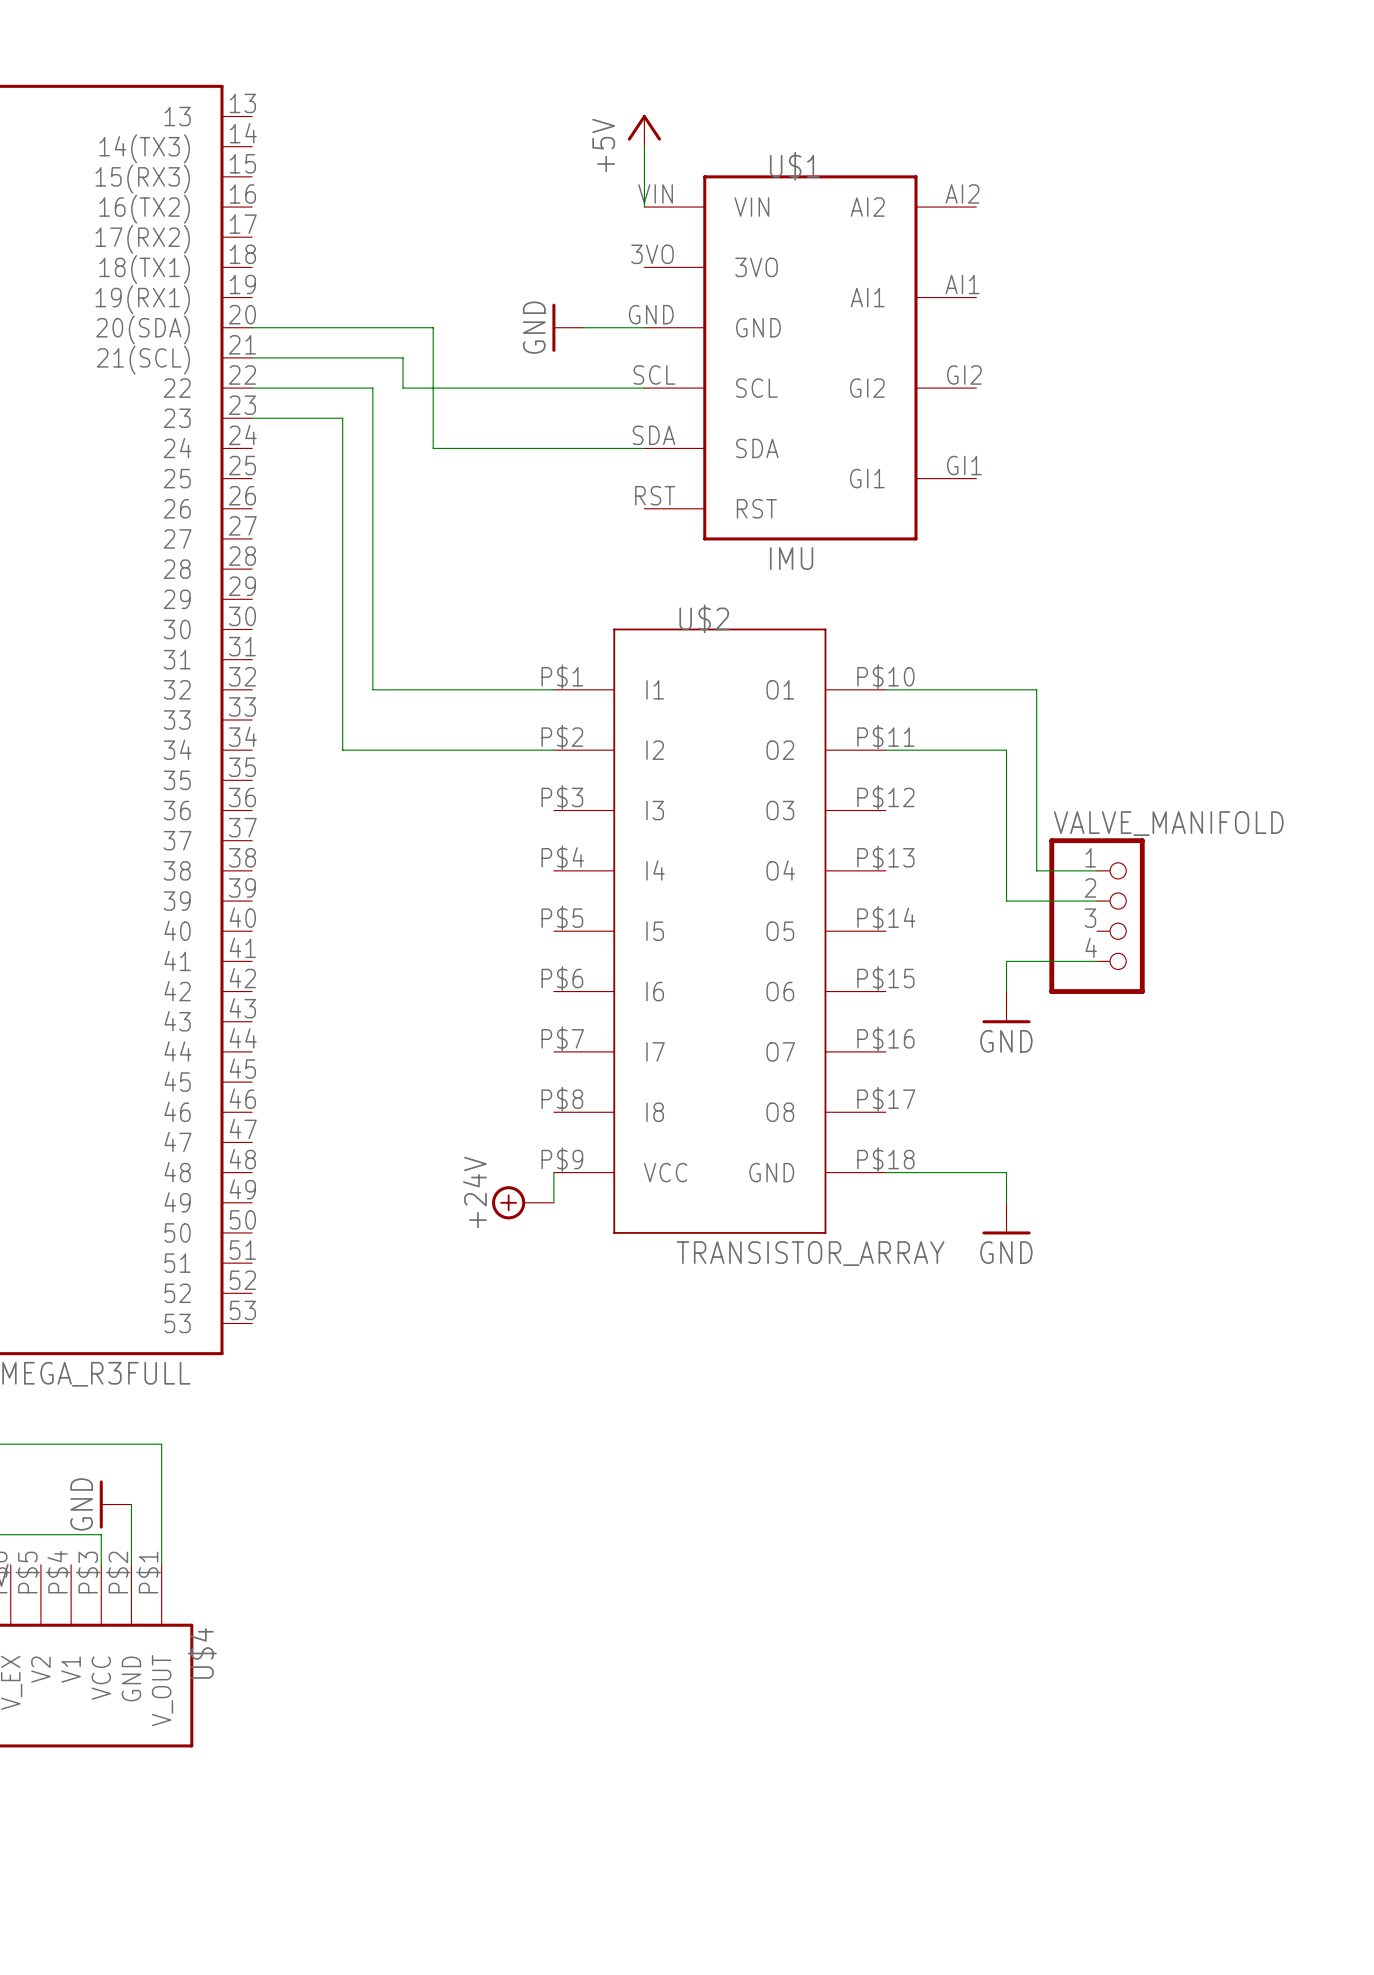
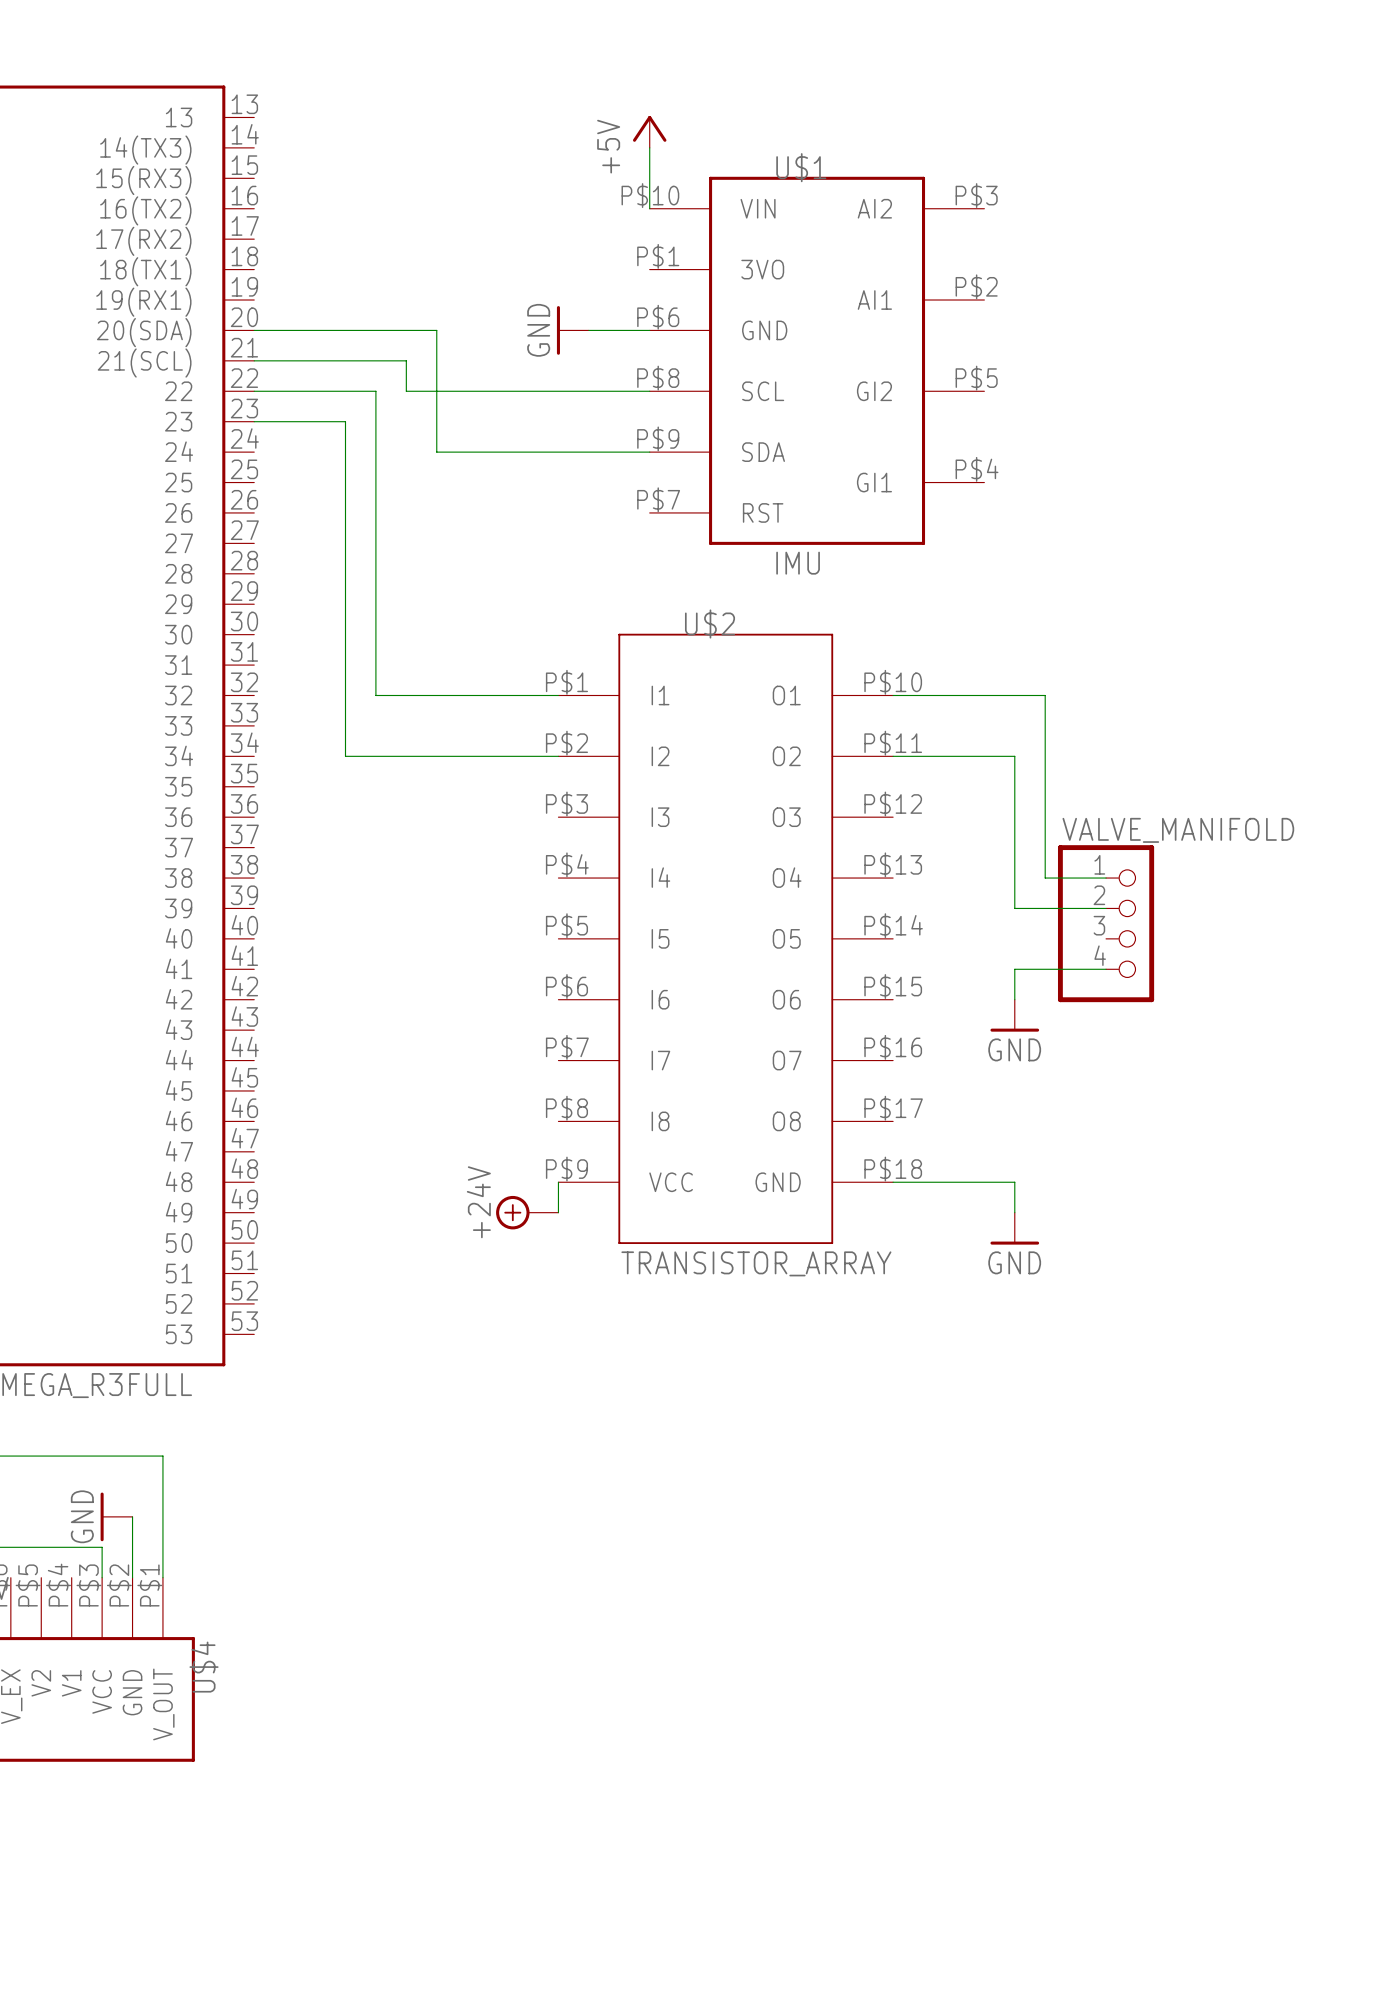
U$1 symbol: [644, 175, 977, 541] -> [649, 176, 985, 545]
U$2 value position: TRANSISTOR_ARRAY (810, 1253) -> TRANSISTOR_ARRAY (756, 1263)

